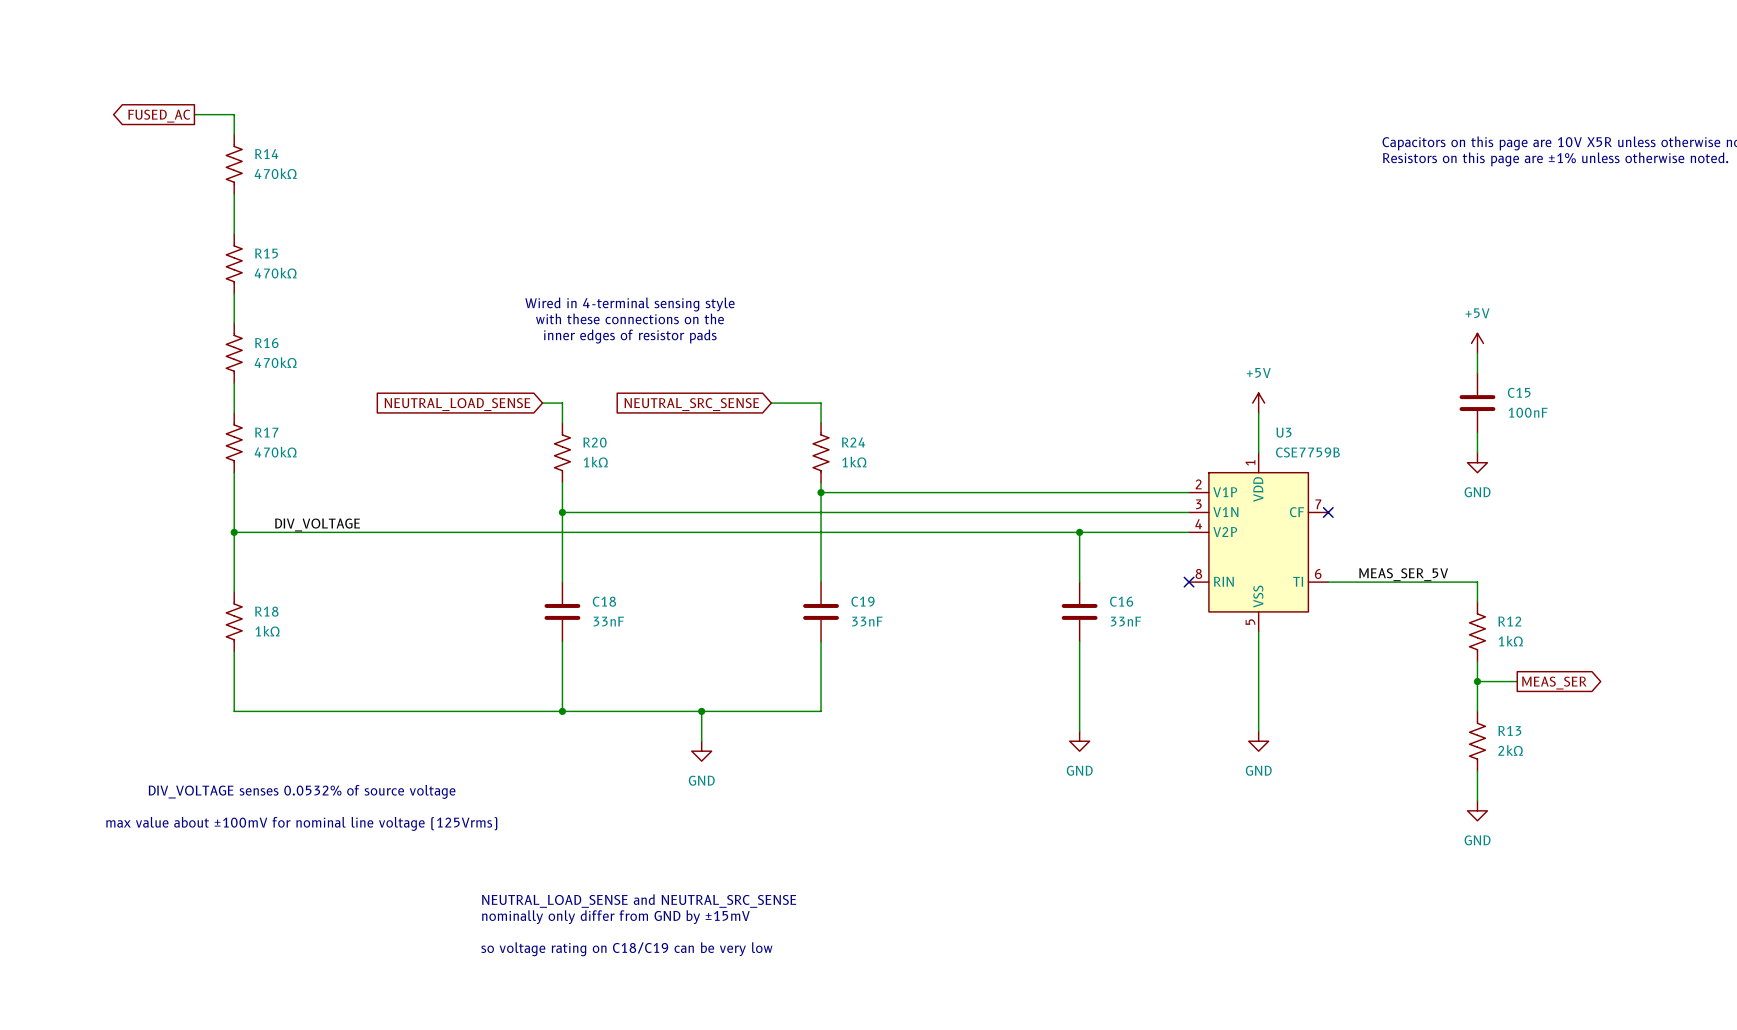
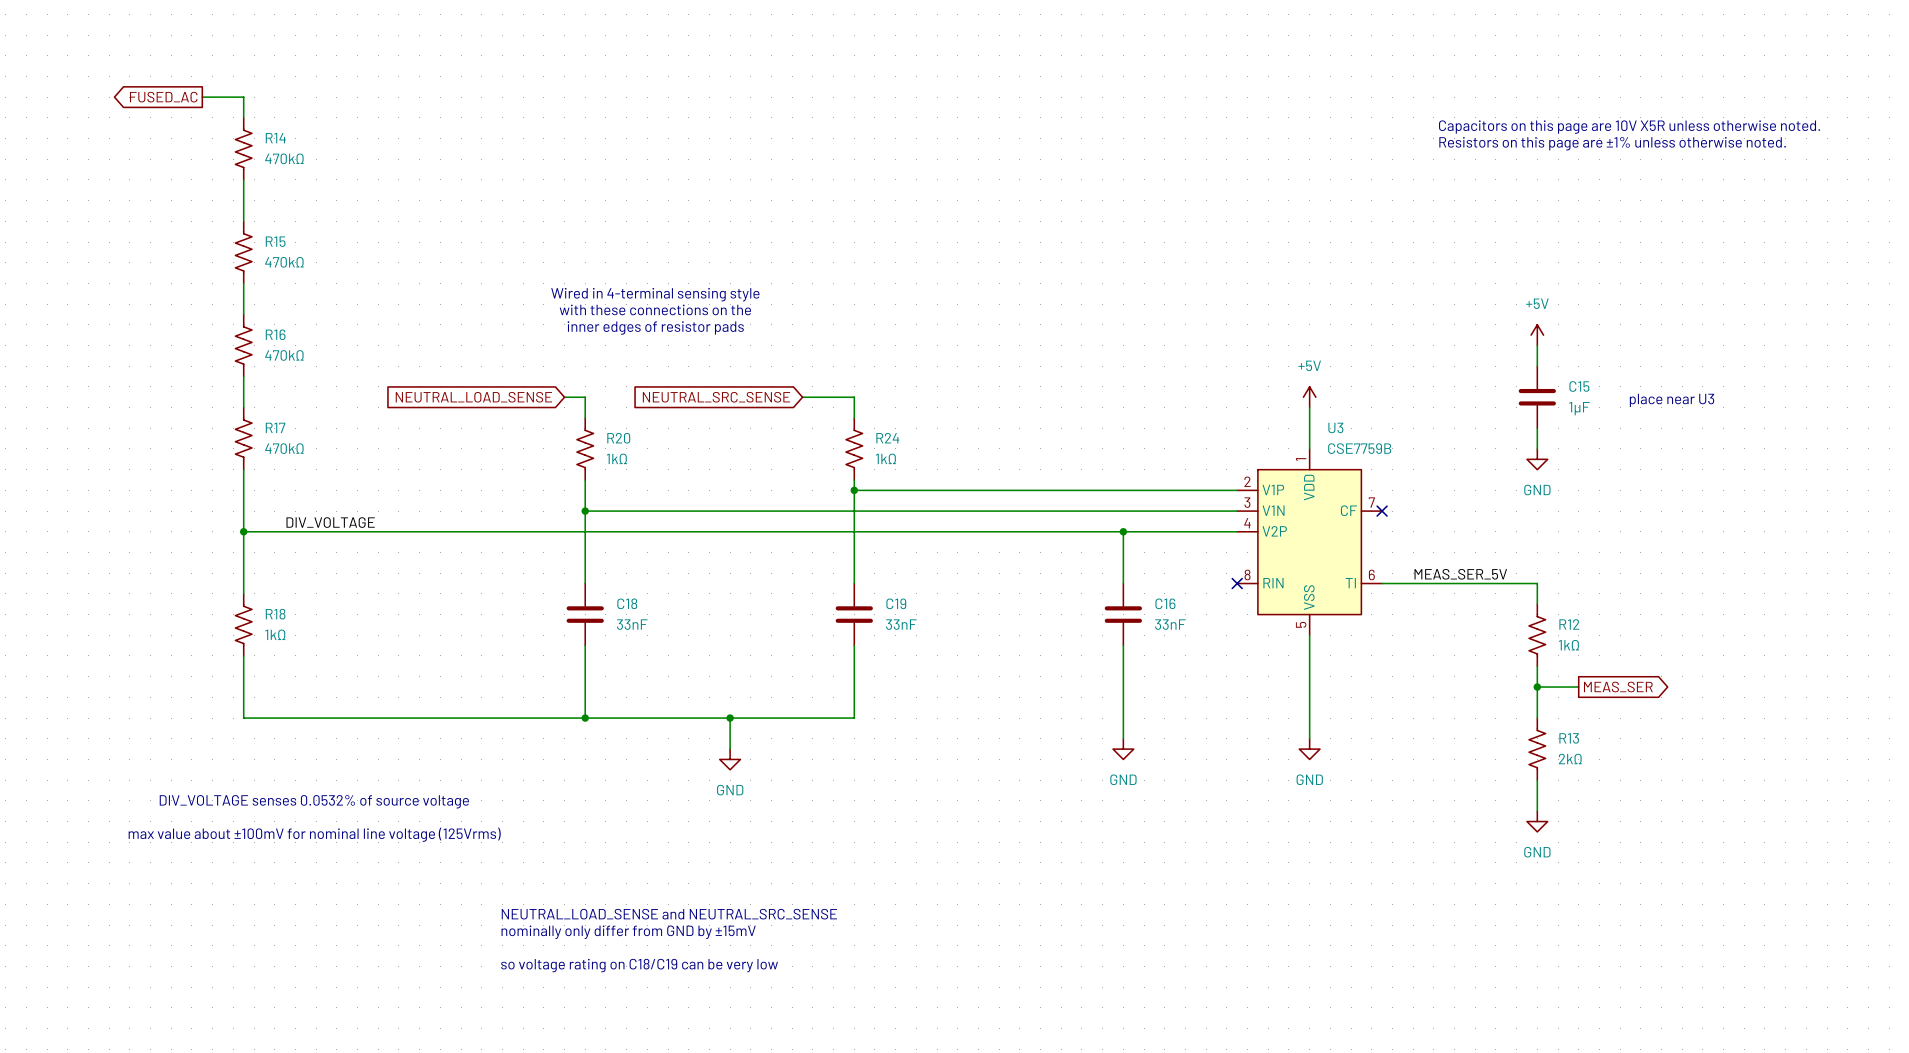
text: none -> place near U3 (1672, 400)
C15 value: 100nF (1528, 412) -> 1µF (1579, 408)

